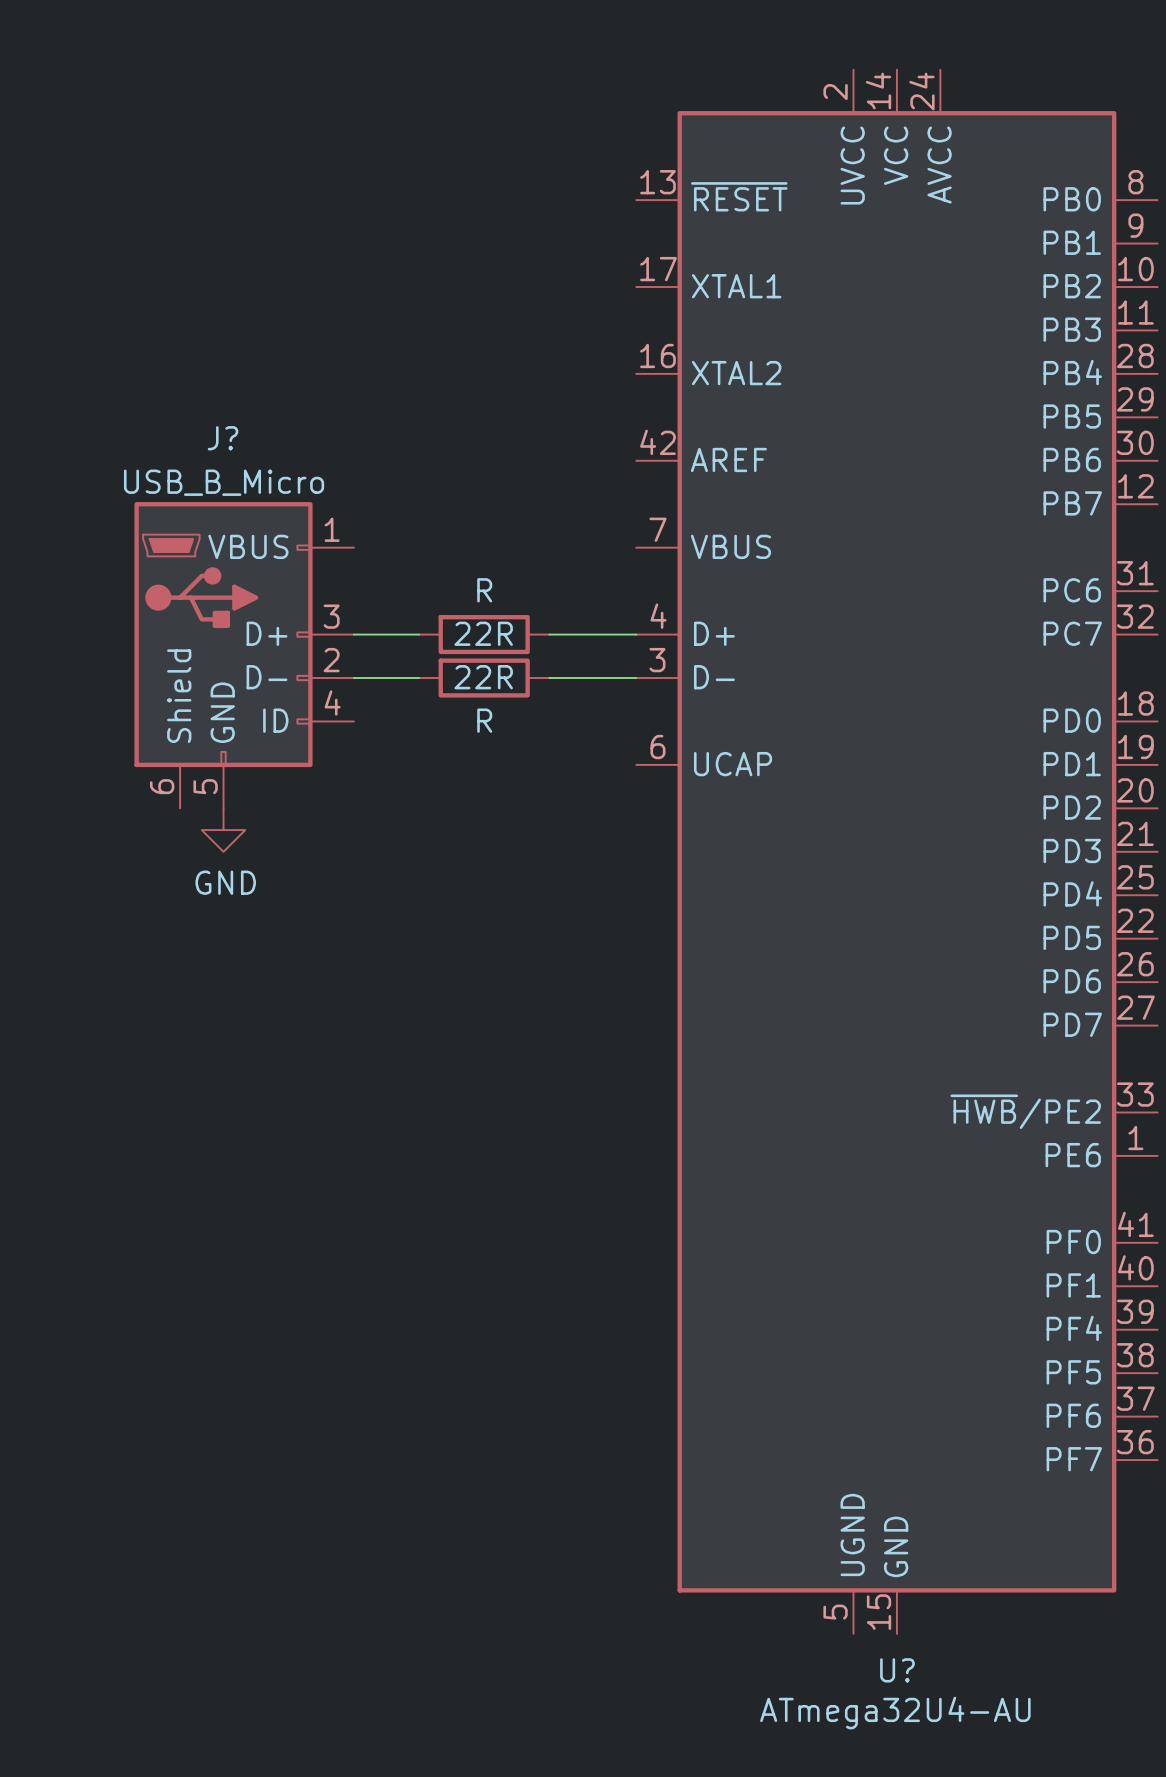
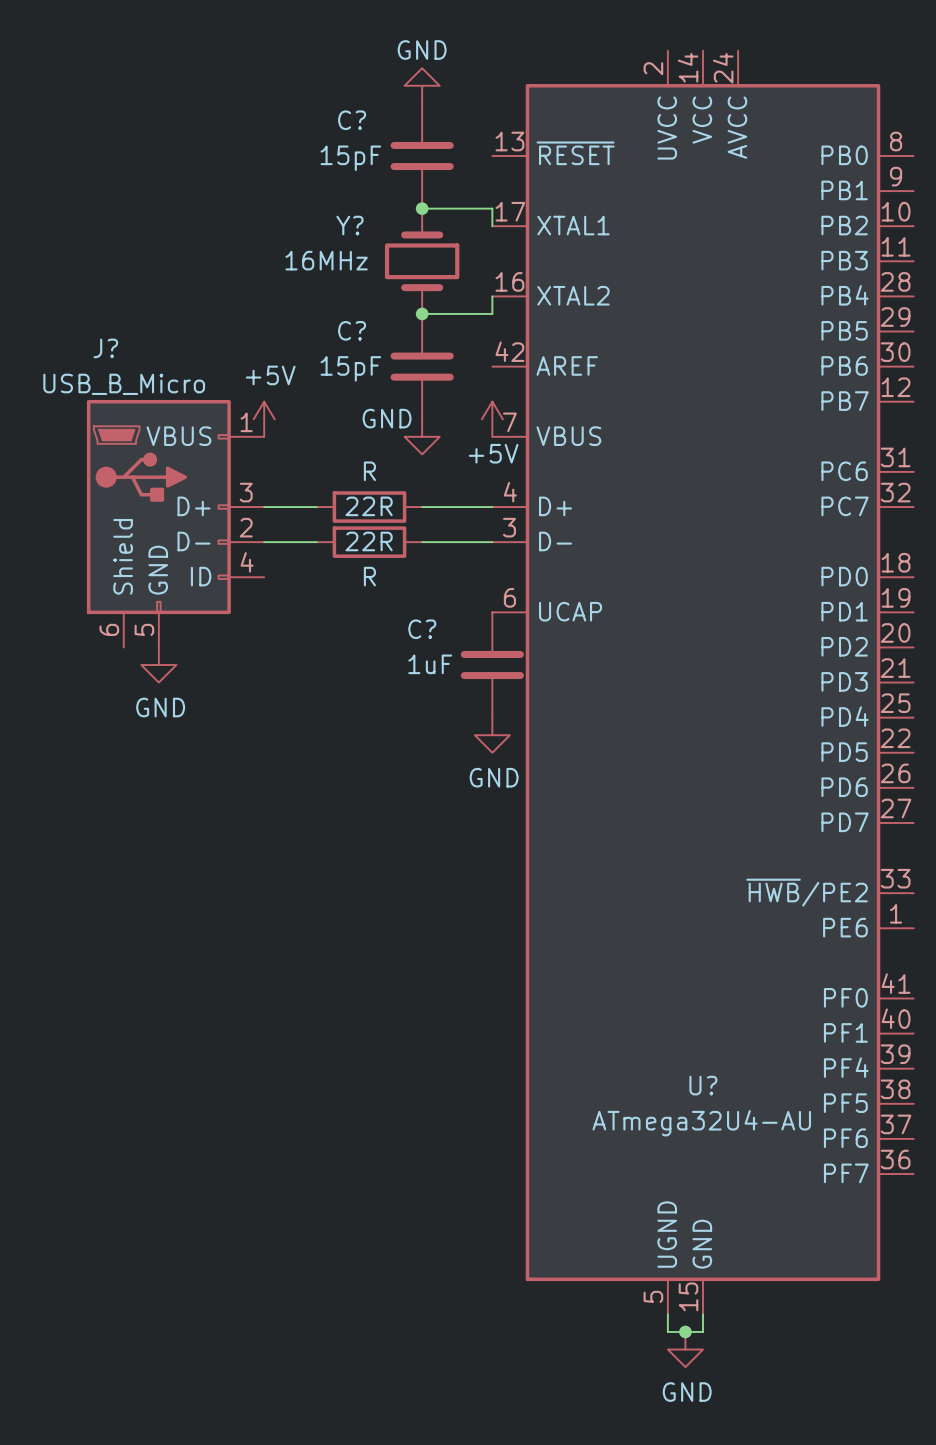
power symbol: none -> GND (422, 85)
C?: none -> 15pF (422, 155)
wire: none -> (422, 208) (492, 208) (492, 226)
junction: none -> (422, 208)
Y?: none -> 16MHz (422, 261)
wire: none -> (492, 296) (492, 313) (422, 313)
junction: none -> (422, 313)
J? name position: J? (223, 438) -> J? (105, 348)
C?: none -> 15pF (422, 366)
J? value position: USB_B_Micro (224, 482) -> USB_B_Micro (124, 384)
power symbol: none -> +5V (264, 419)
power symbol: none -> +5V (492, 419)
power symbol: none -> GND (422, 436)
C?: none -> 1uF (492, 665)
power symbol: none -> GND (492, 735)
wire: none -> (667, 1314) (667, 1331) (702, 1331) (702, 1314)
junction: none -> (685, 1331)
U? name position: U? (897, 1670) -> U? (703, 1085)
power symbol: none -> GND (685, 1349)
U? value position: ATmega32U4-AU (895, 1713) -> ATmega32U4-AU (701, 1123)

